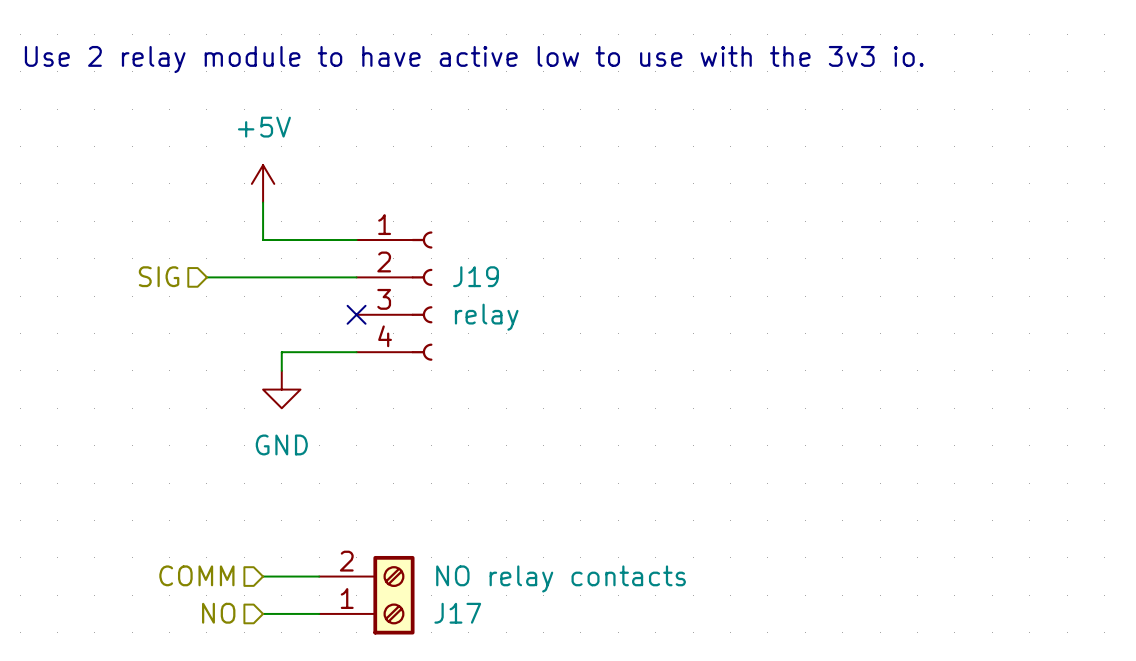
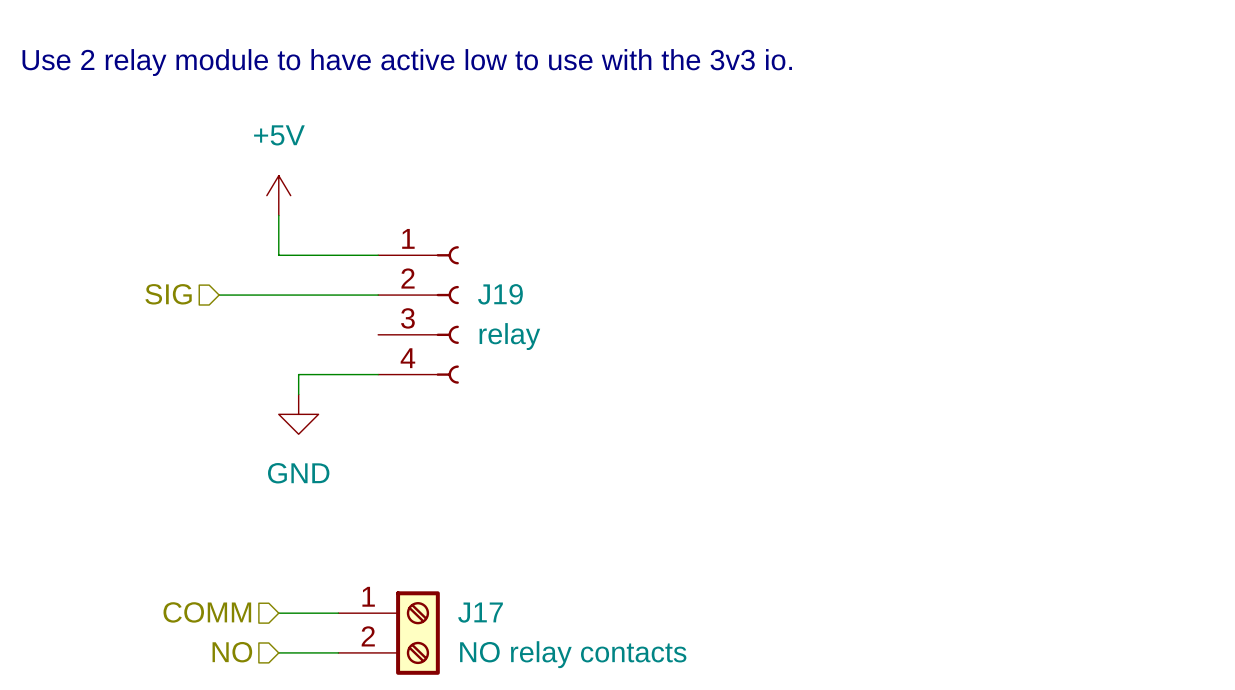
no-connect mark: (356, 314) -> none
J17 flip: as is (393, 595) -> up-down (417, 633)

